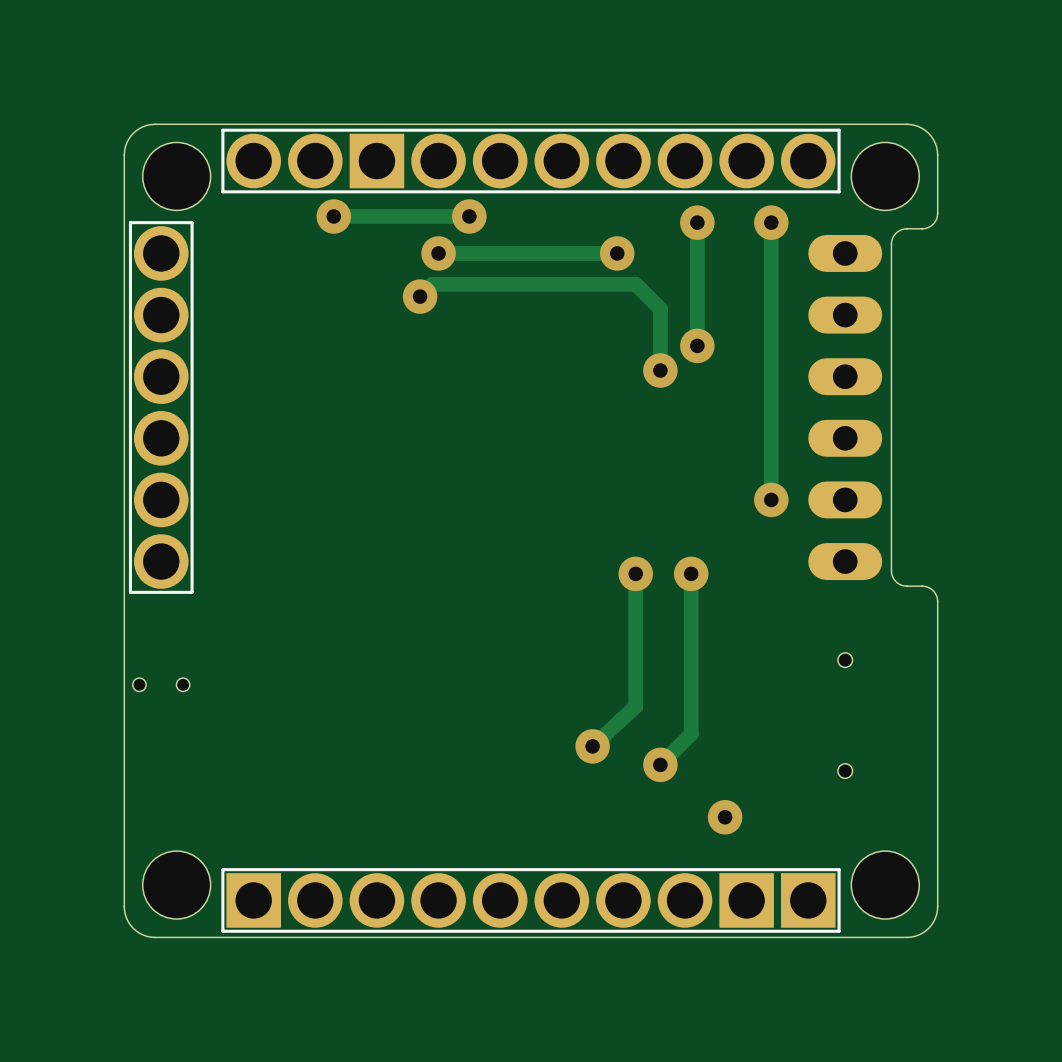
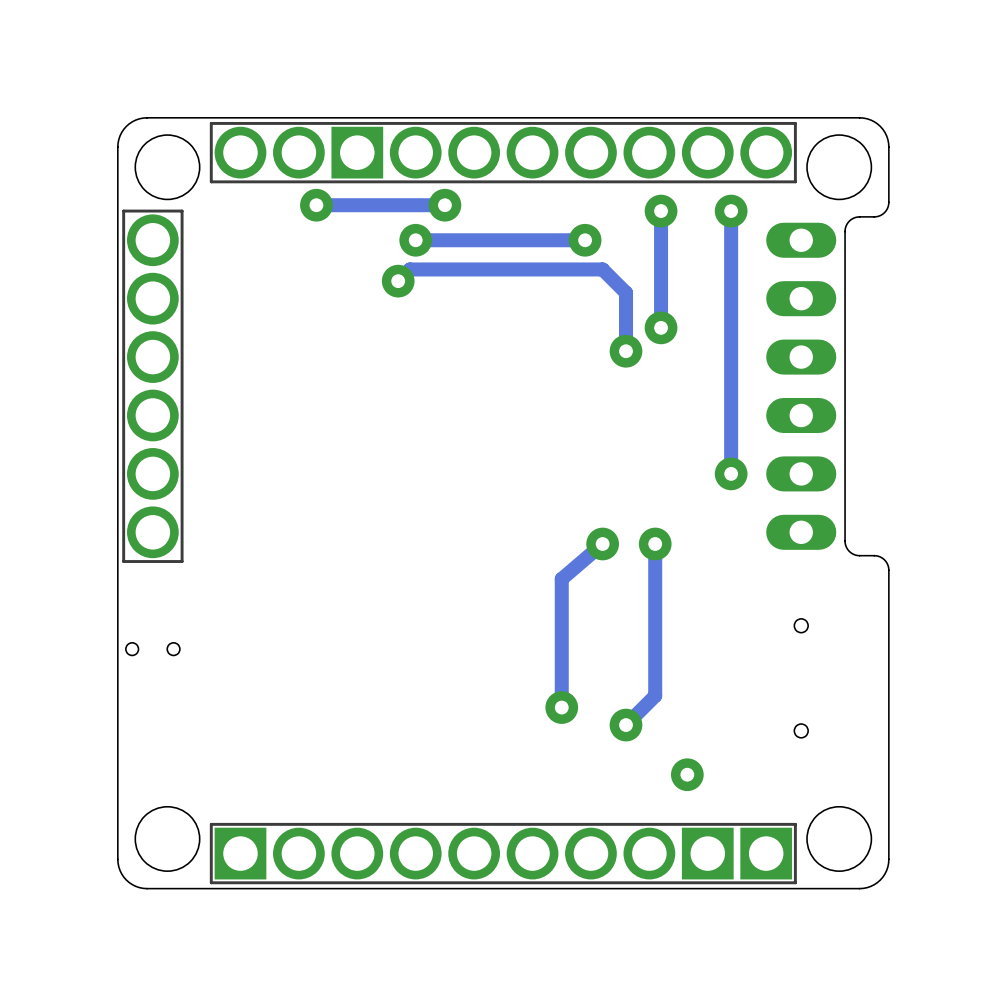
track: (635, 573) (635, 706) (592, 746) -> (602, 543) (561, 579) (561, 707)

